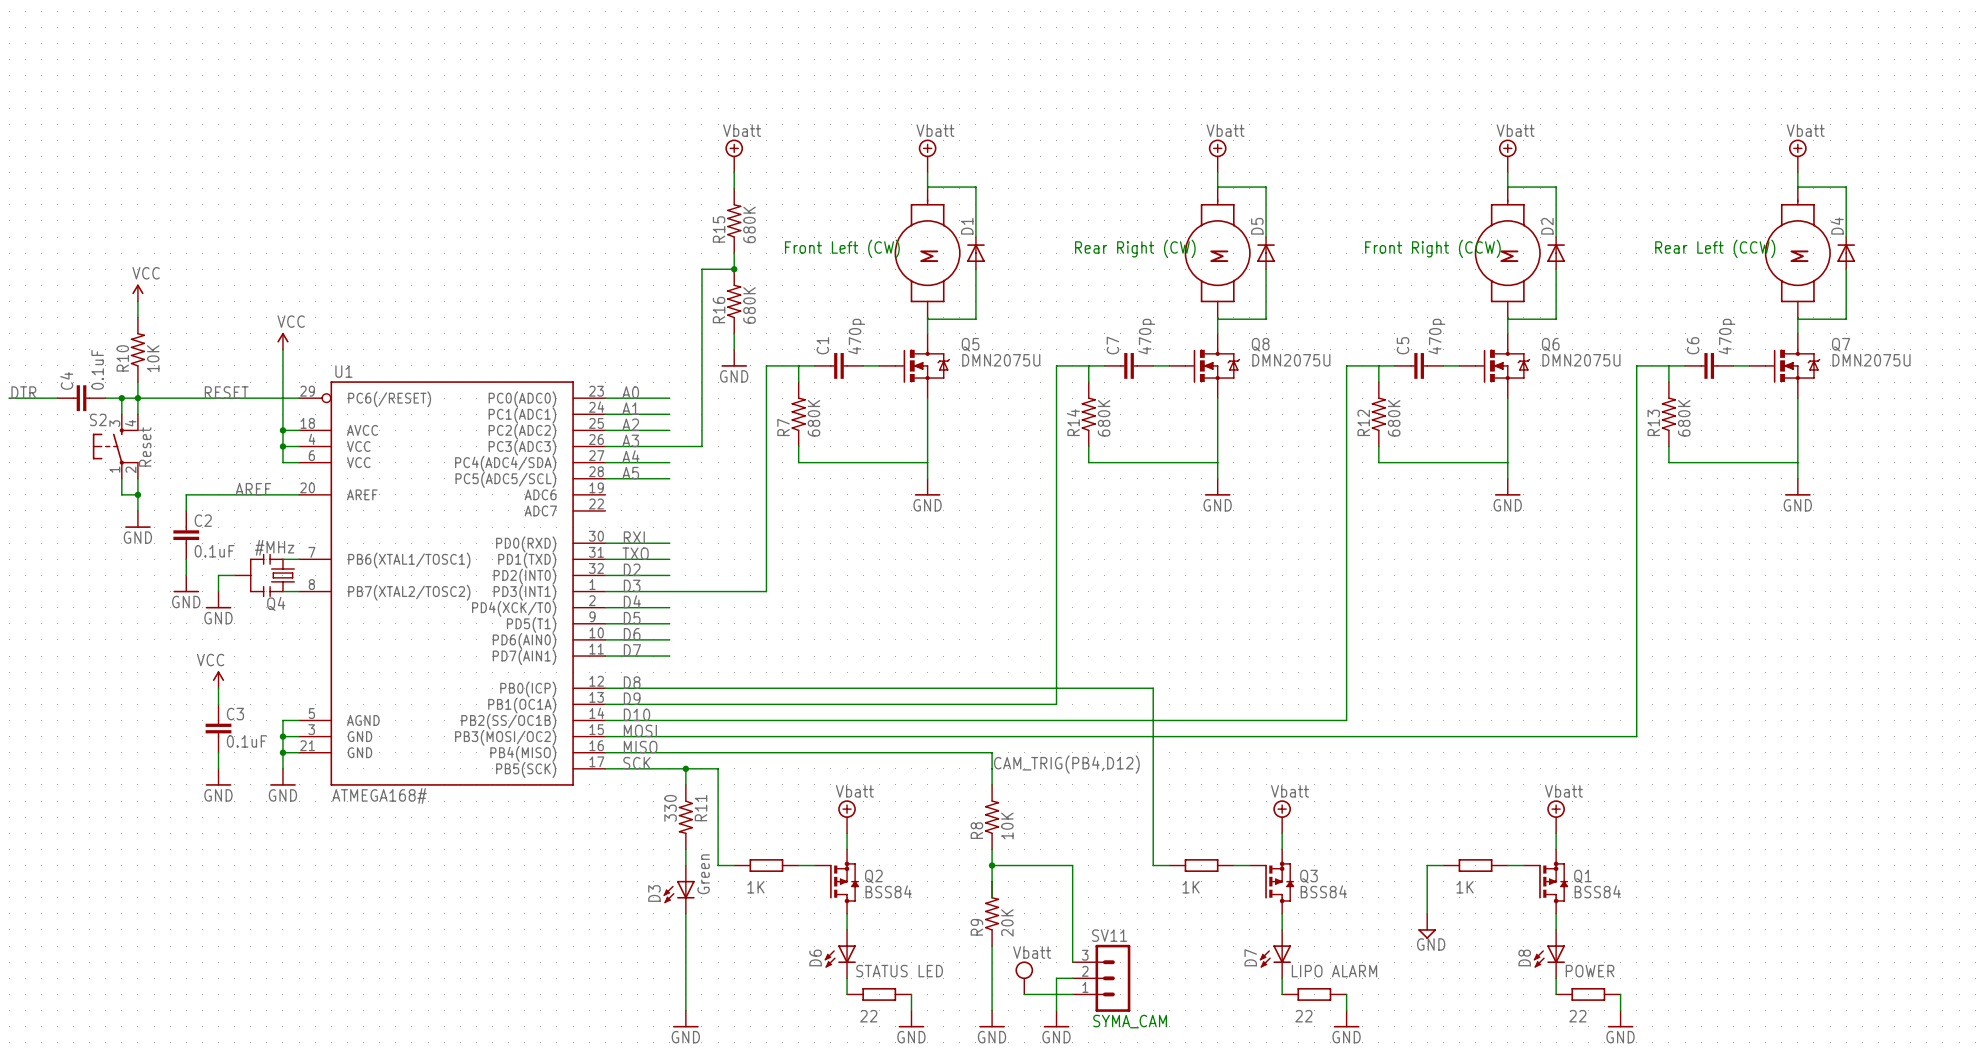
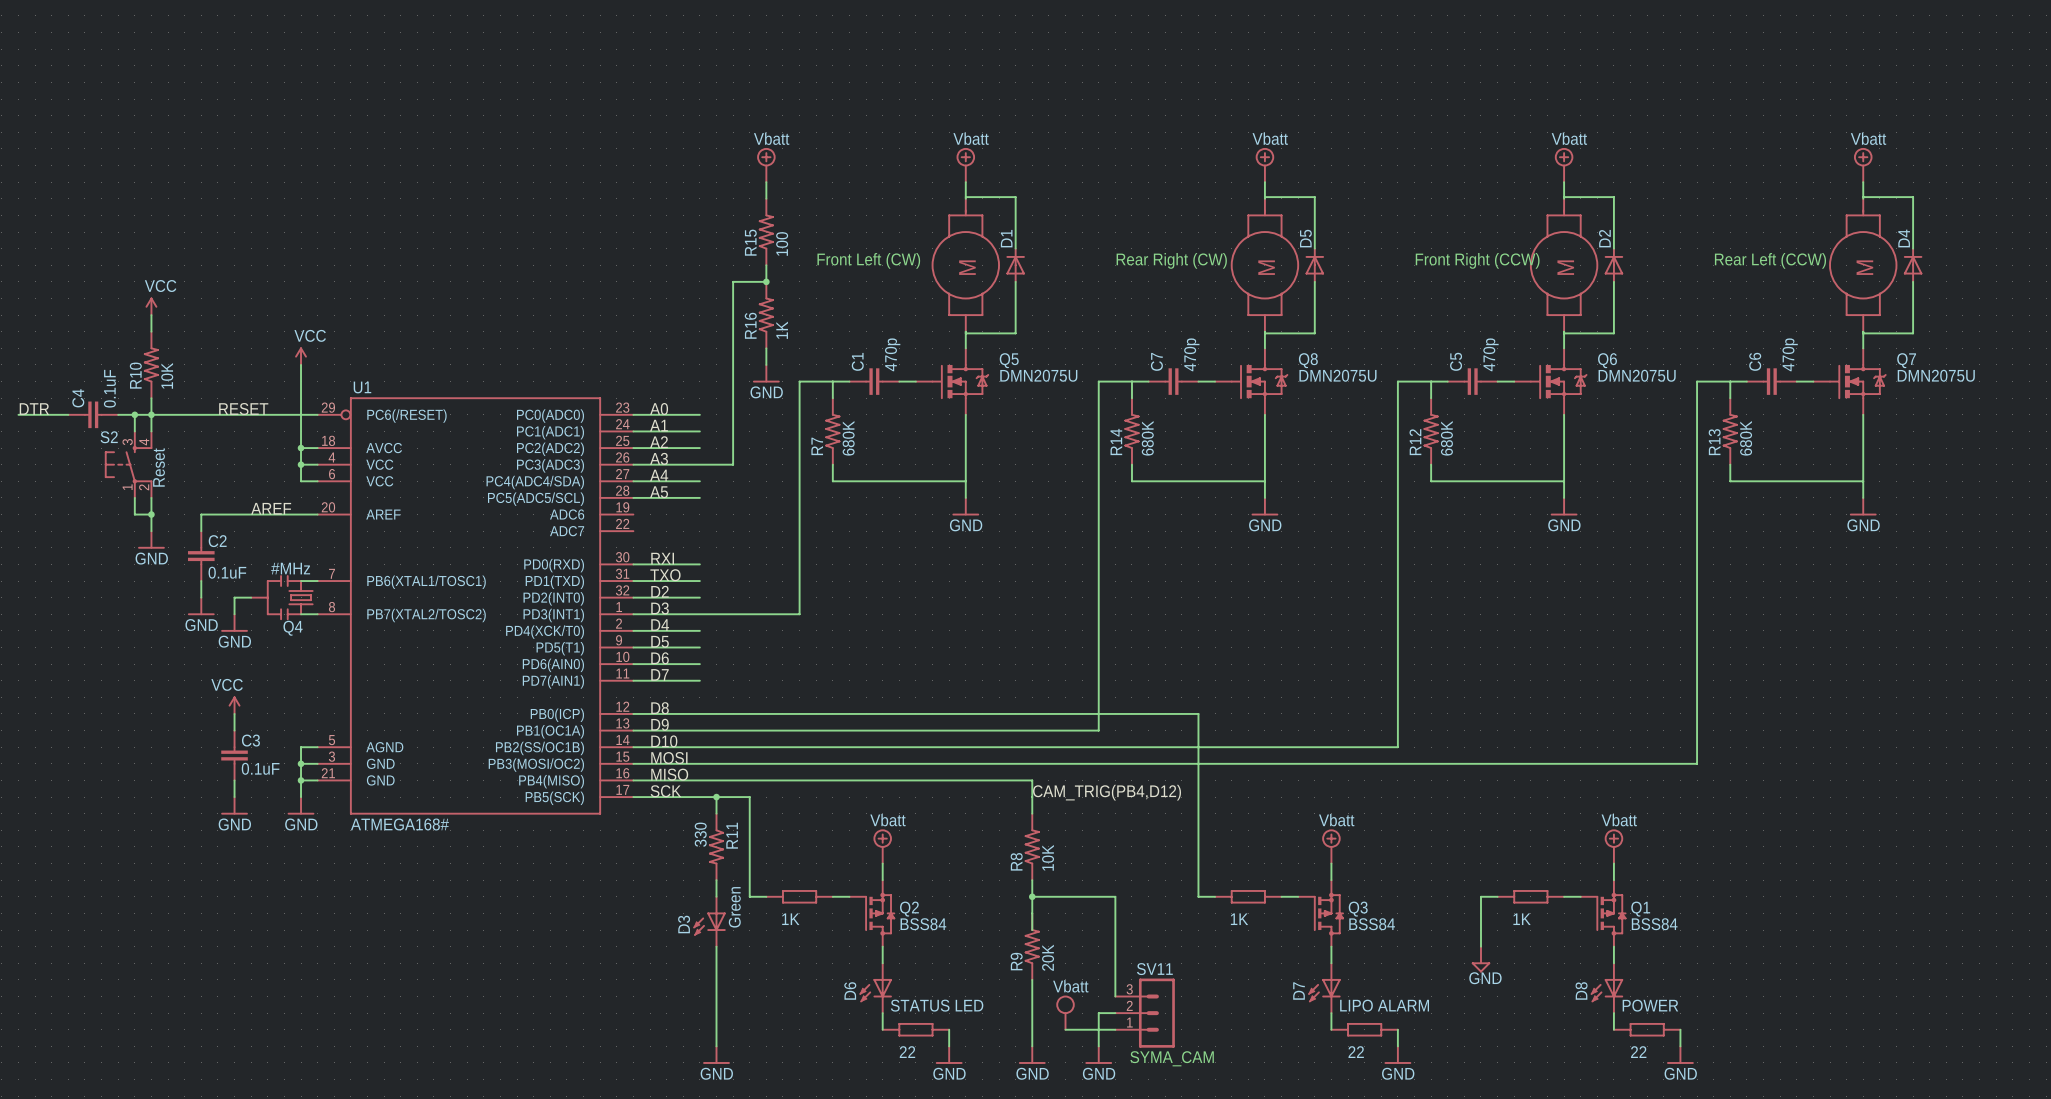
R15 value: 680K (749, 224) -> 100 (782, 243)
R16 value: 680K (749, 305) -> 1K (782, 330)

